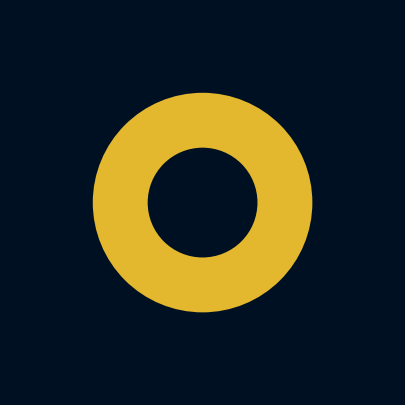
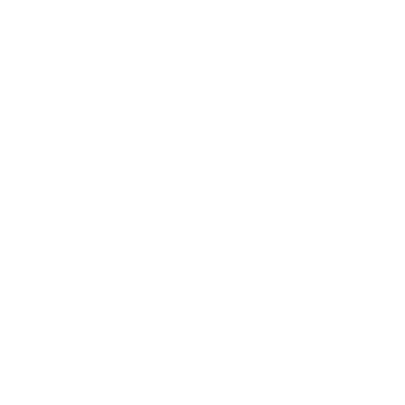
part: (202, 202) -> none

